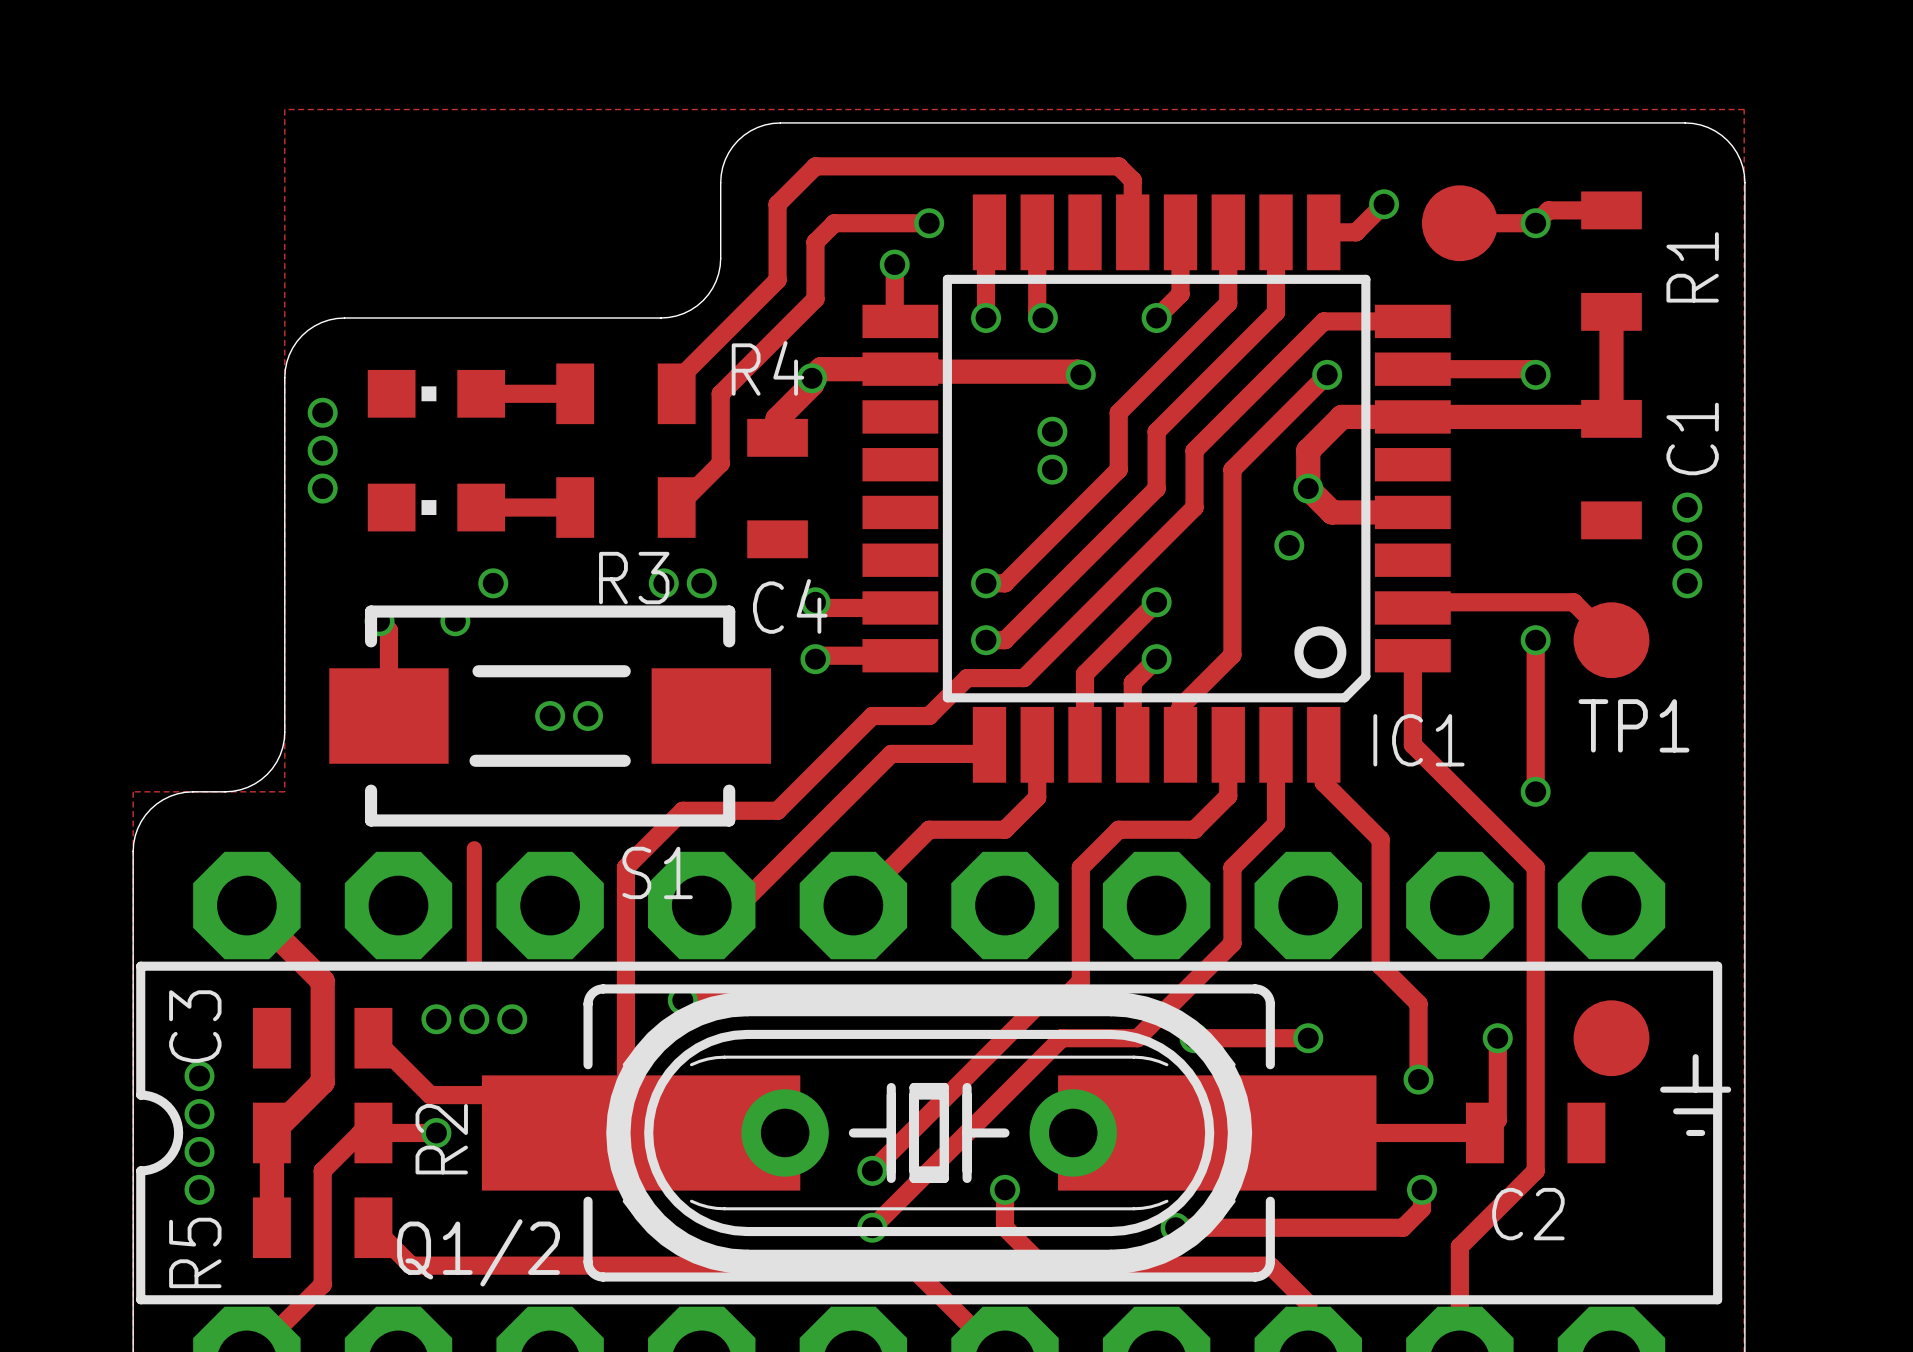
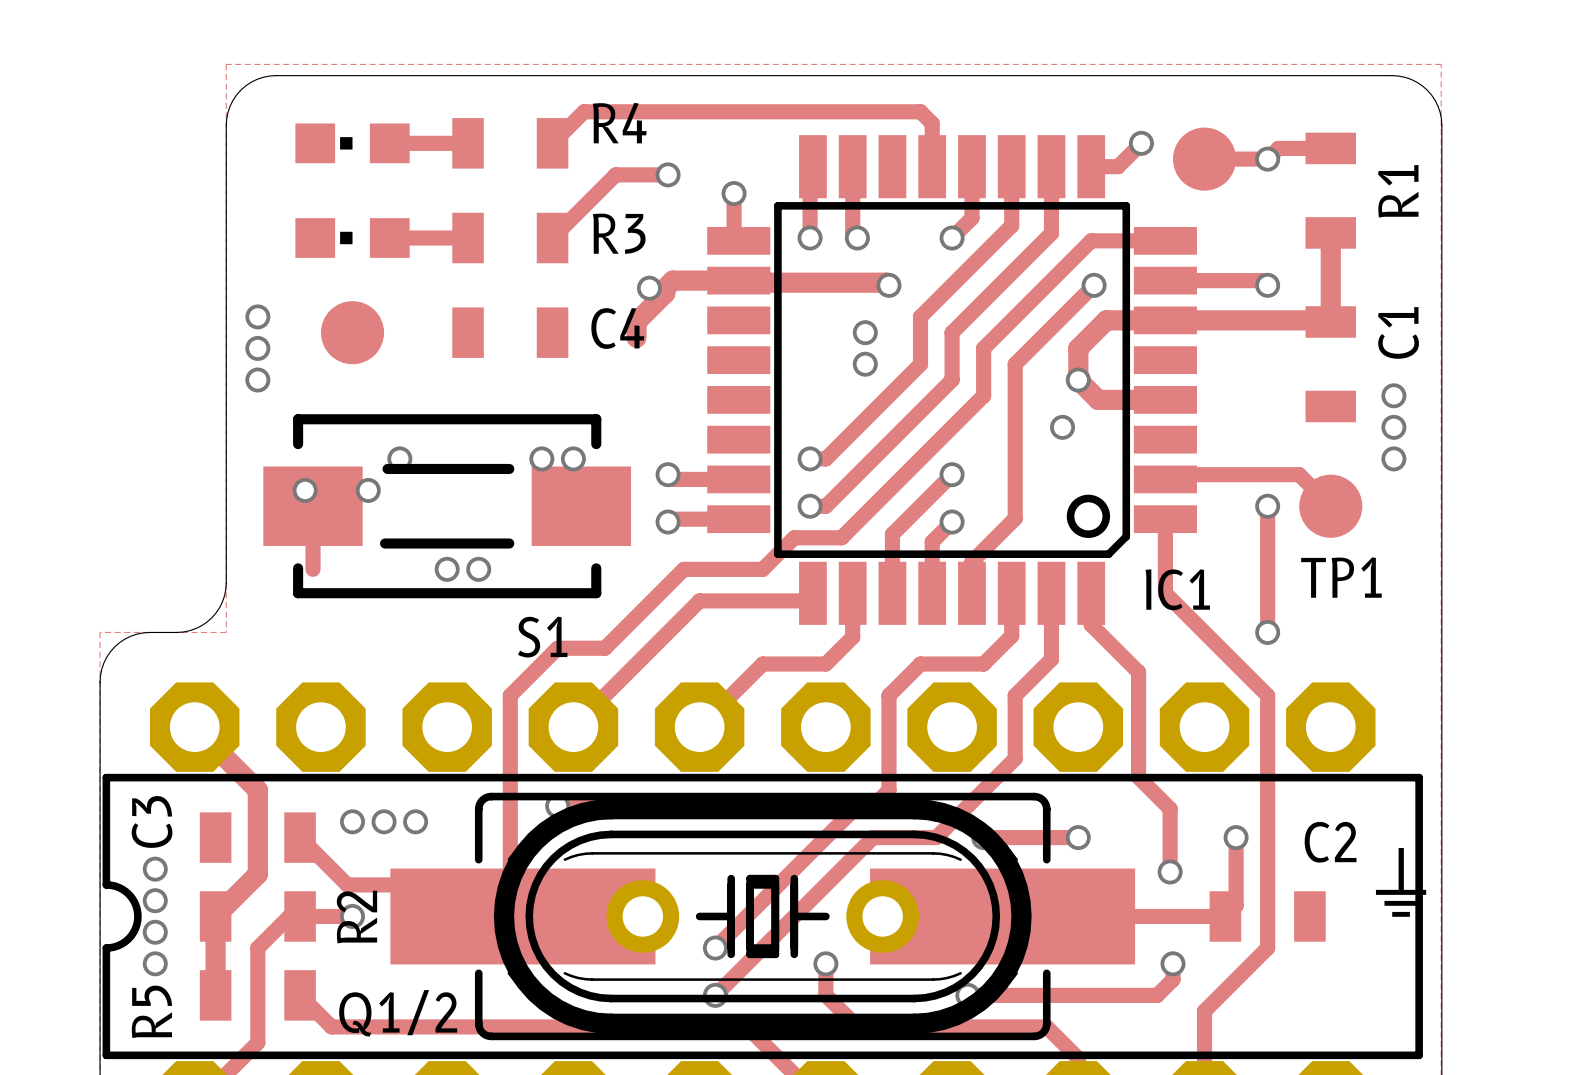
board edge: (780, 122) (757, 127) (744, 135) (733, 146) (725, 159) (720, 182) (720, 258) (718, 273) (708, 294) (690, 310) (676, 315) (661, 318) (336, 318) (314, 326) (297, 341) (289, 354) (284, 377) -> (638, 75) (275, 75) (263, 77) (251, 82) (236, 95) (230, 106) (226, 118) (226, 287)
track: (815, 166) (777, 204) (777, 280) (676, 380) (676, 393) -> (668, 111) (584, 111) (552, 143)
part: none -> (352, 143)
track: (929, 223) (834, 223) (815, 242) (815, 299) (720, 393) (720, 463) (676, 507) -> none
via: (929, 223) -> none
track: none -> (668, 174) (615, 174) (552, 238)
via: none -> (668, 174)
via position: (812, 378) -> (649, 288)
part position: (436, 393) -> (352, 238)
track: (481, 393) (575, 393) -> (389, 143) (468, 143)
R4 position: (625, 393) -> (510, 143)
C4 rotation: 0° (777, 488) -> 90° clockwise (510, 332)
C4 position: (777, 488) -> (510, 332)
part: (436, 507) -> none
track: (481, 507) (575, 507) -> (389, 238) (468, 238)
R3 position: (625, 507) -> (510, 238)
R3 name position: R3 (634, 578) -> R3 (619, 233)
C4 name position: C4 (790, 606) -> C4 (617, 328)
S1 position: (550, 716) -> (447, 506)
track: (872, 716) (777, 810) (739, 810) -> (715, 569) (683, 569) (604, 648)
track: (891, 753) (739, 905) (701, 905) -> (731, 600) (699, 600) (573, 727)
track: (474, 848) (474, 962) -> none
part position: (1611, 1038) -> (352, 332)
C2 name position: C2 (1528, 1214) -> C2 (1330, 842)

